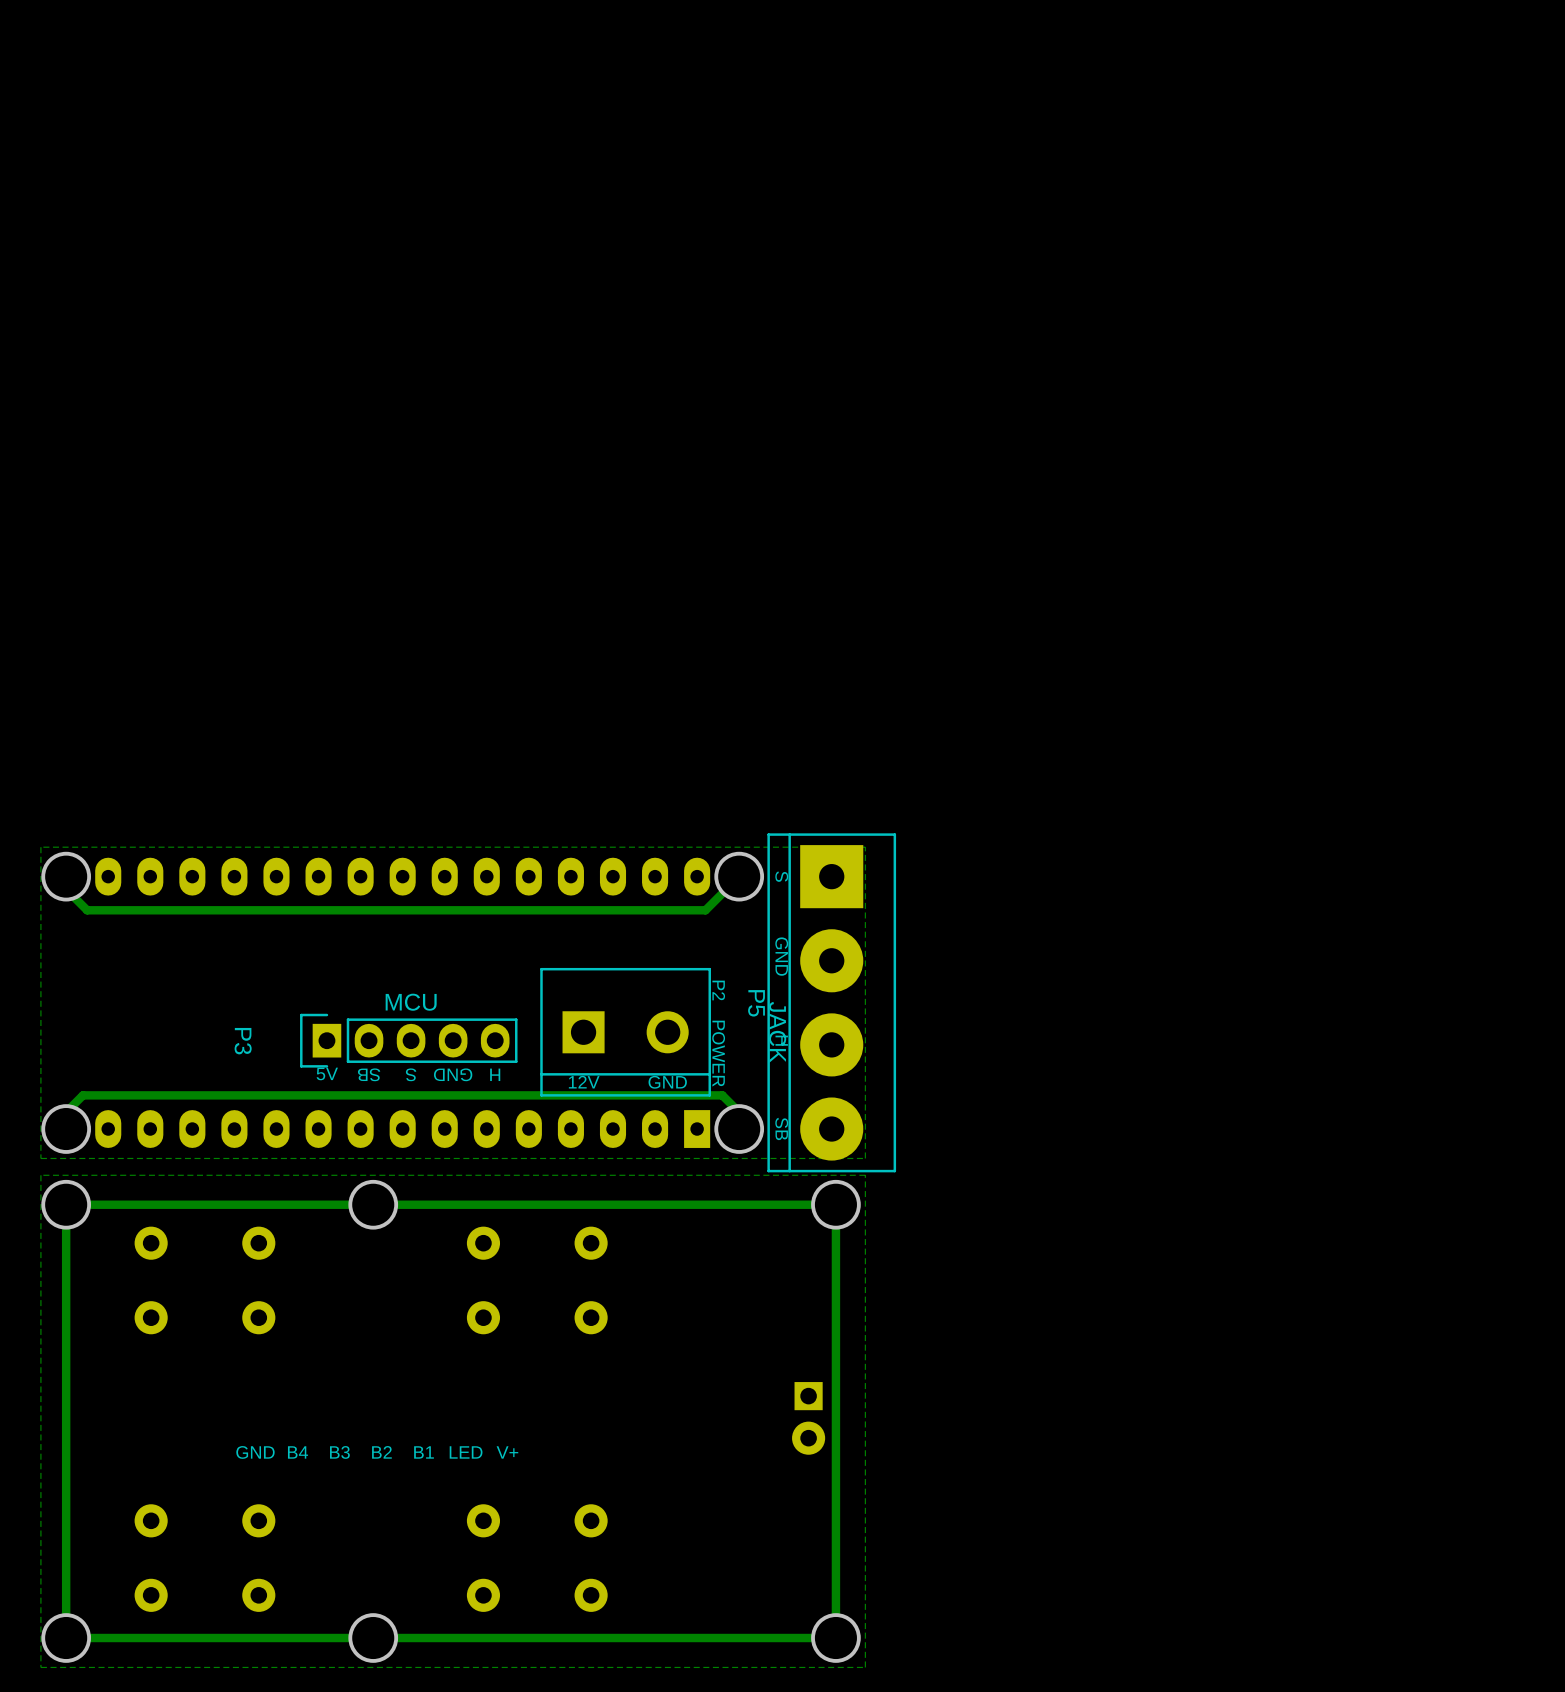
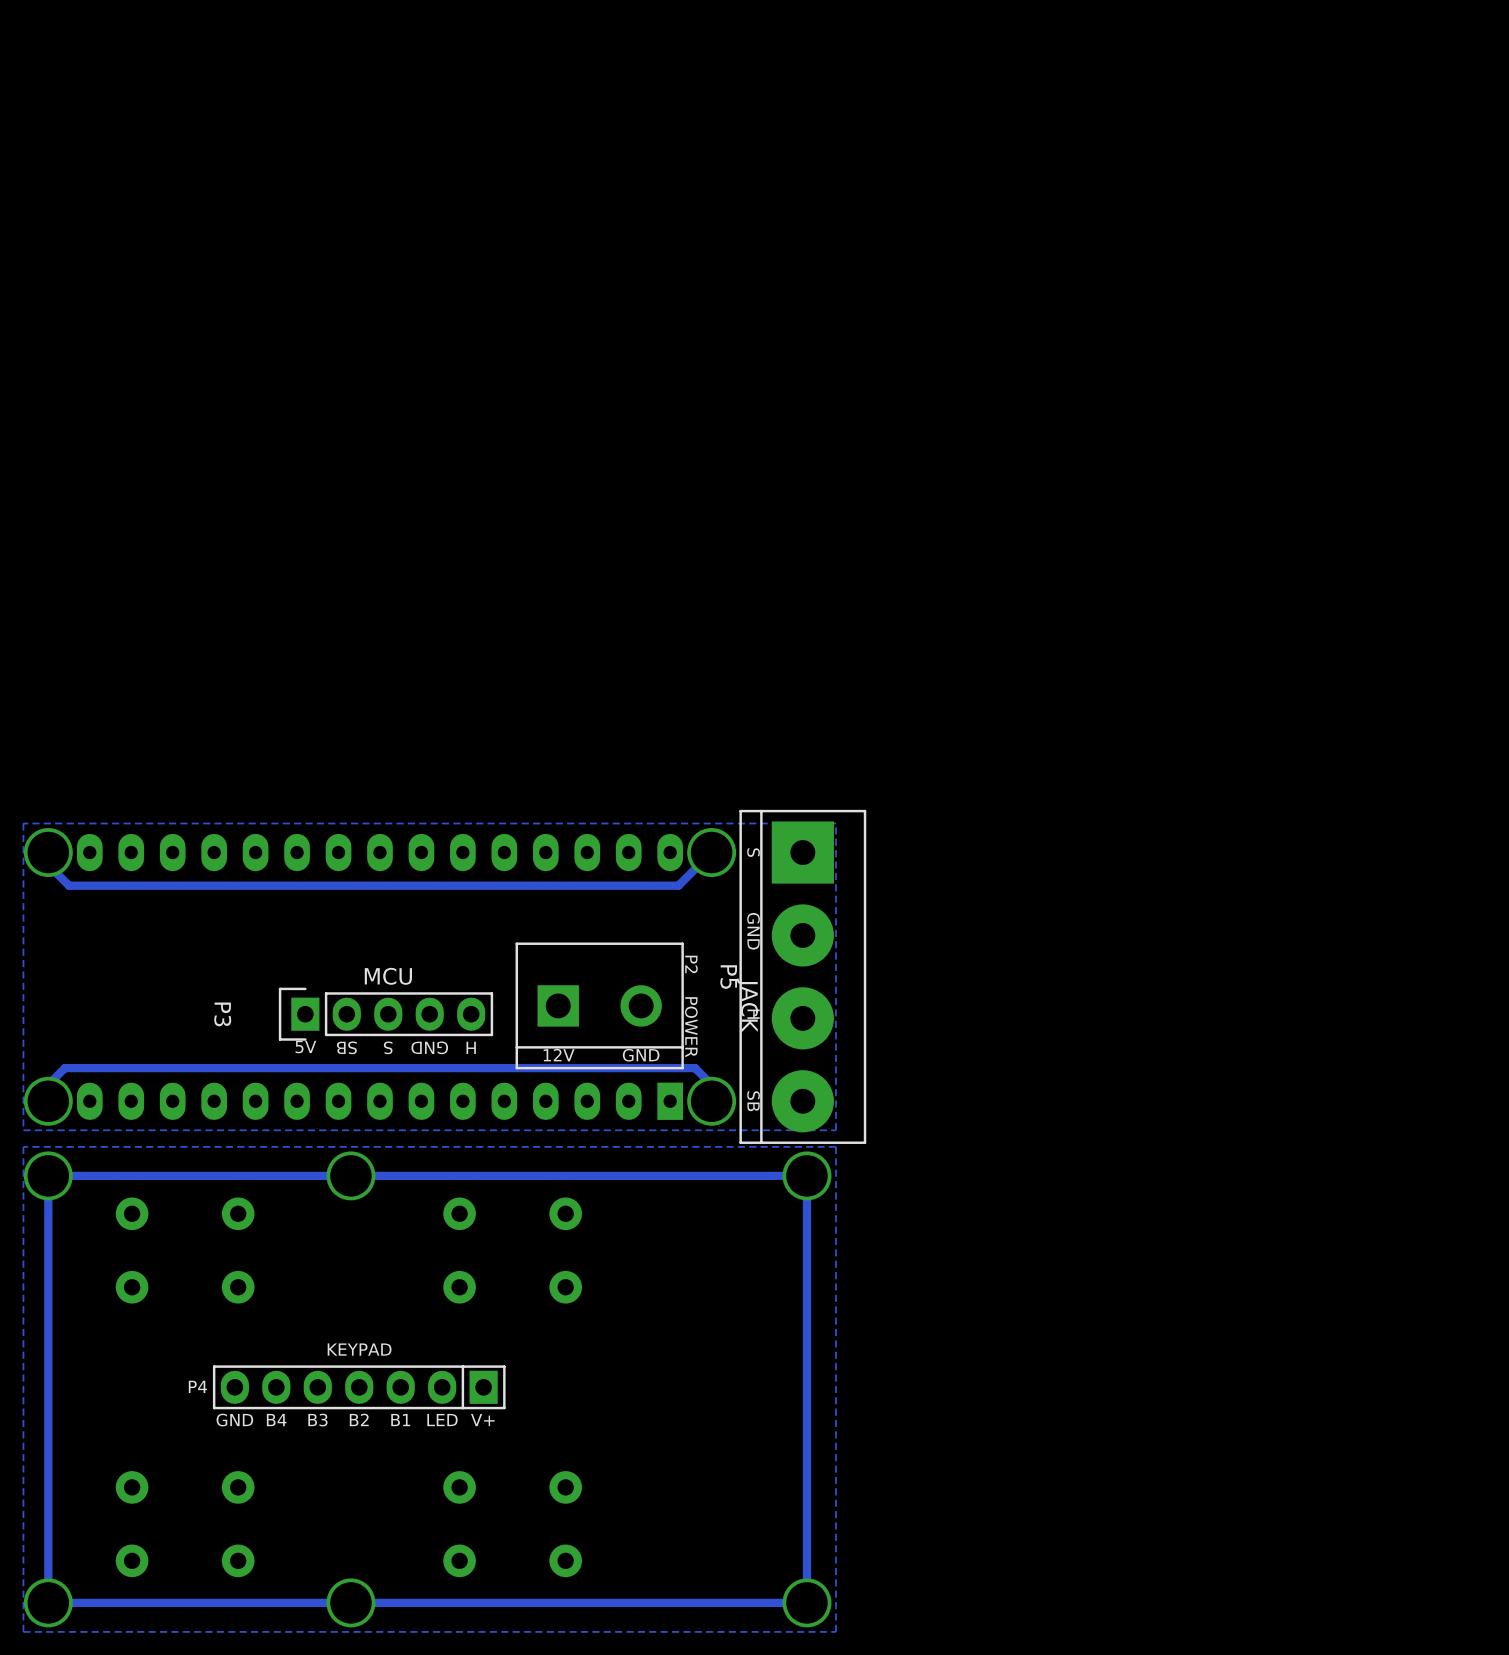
part: (808, 1418) -> none
P4: none -> KEYPAD (359, 1387)

